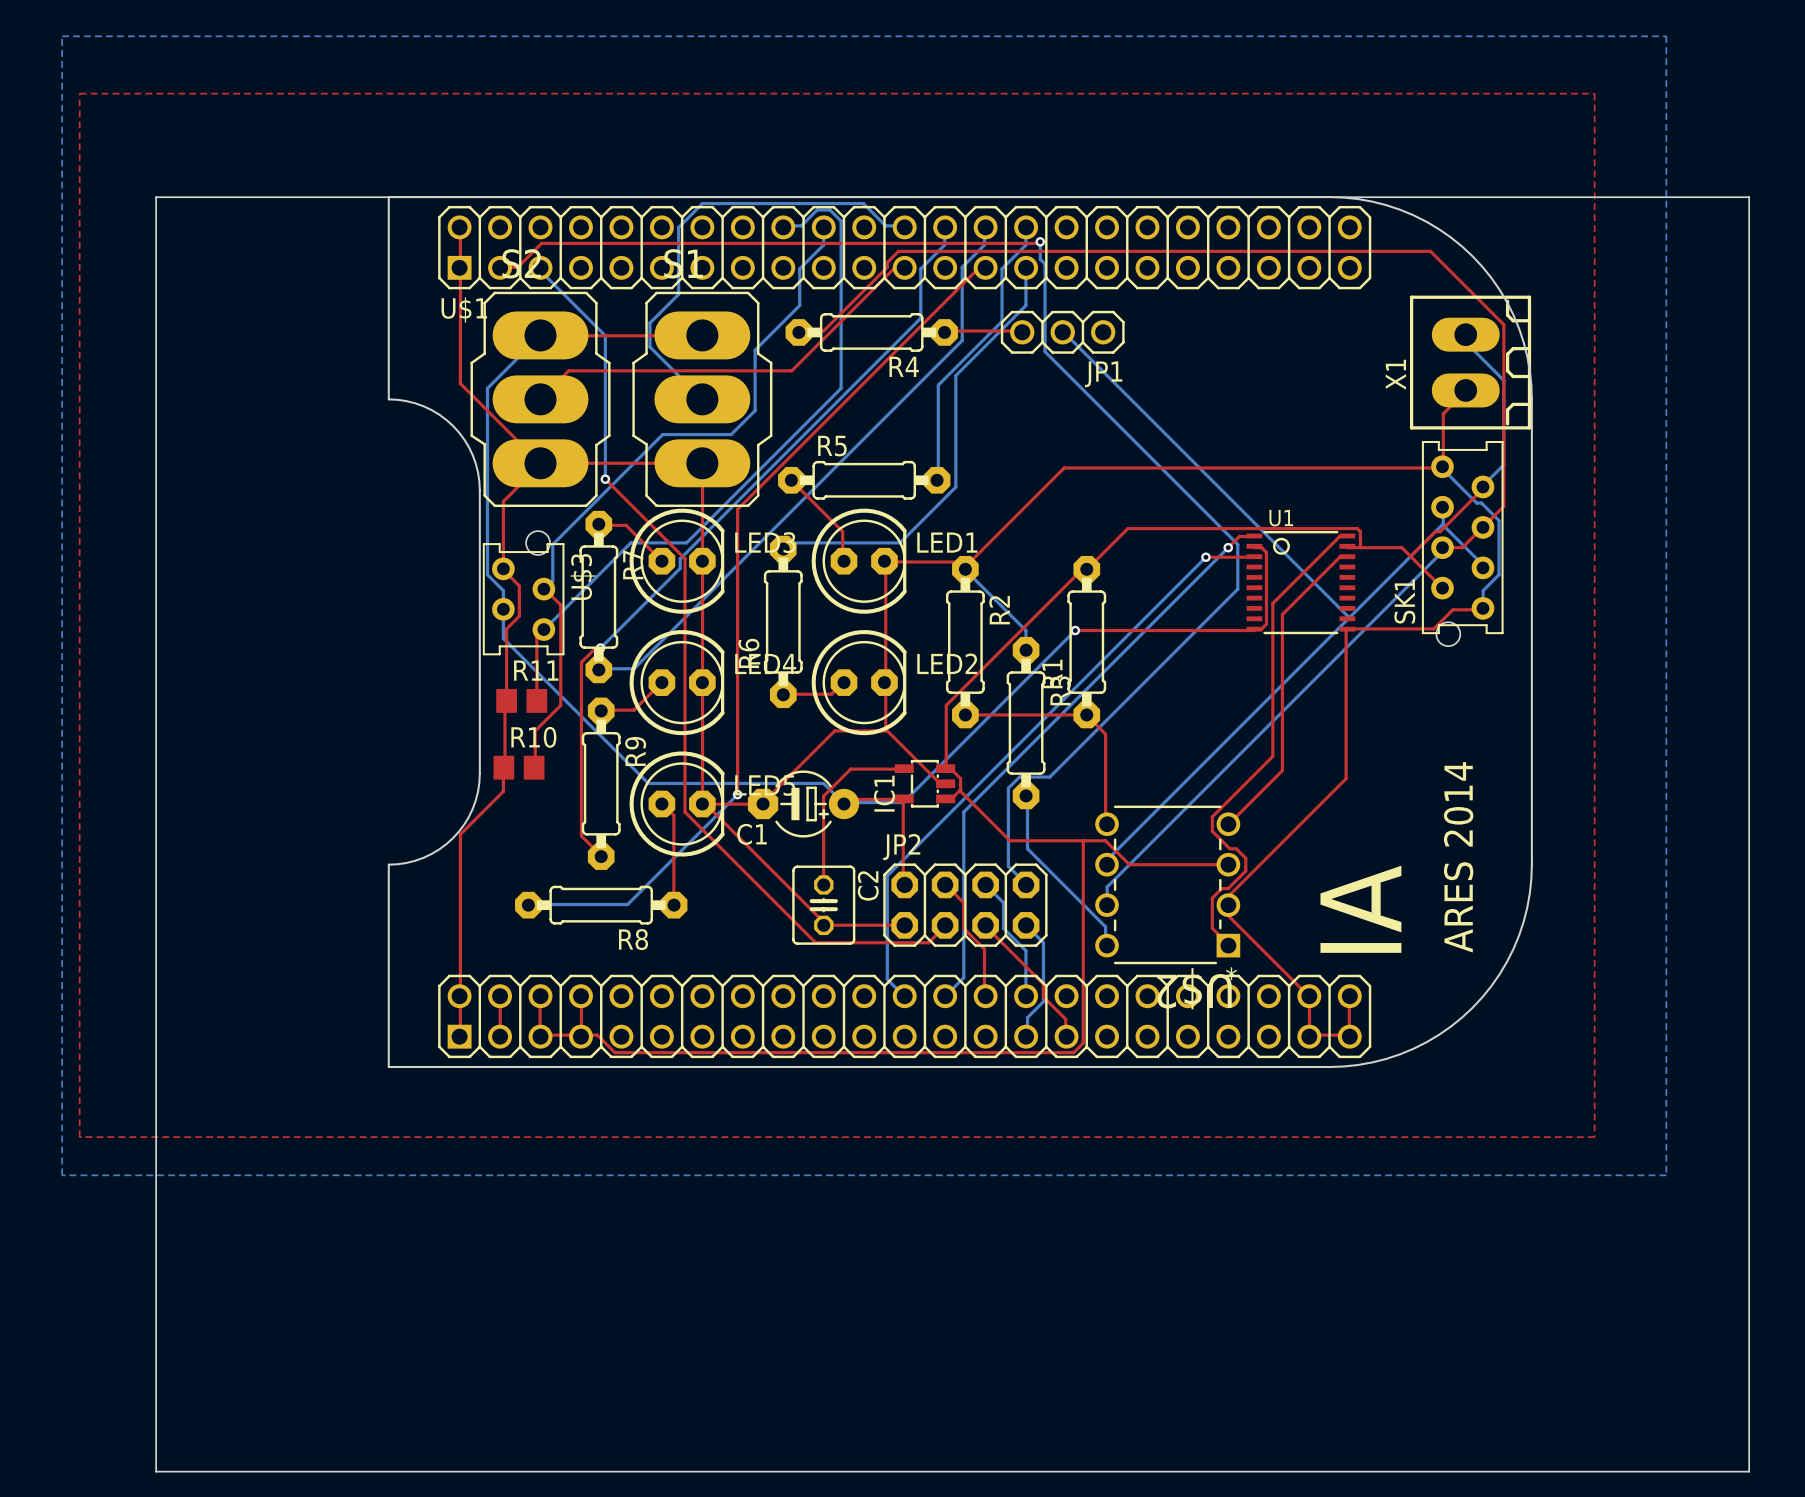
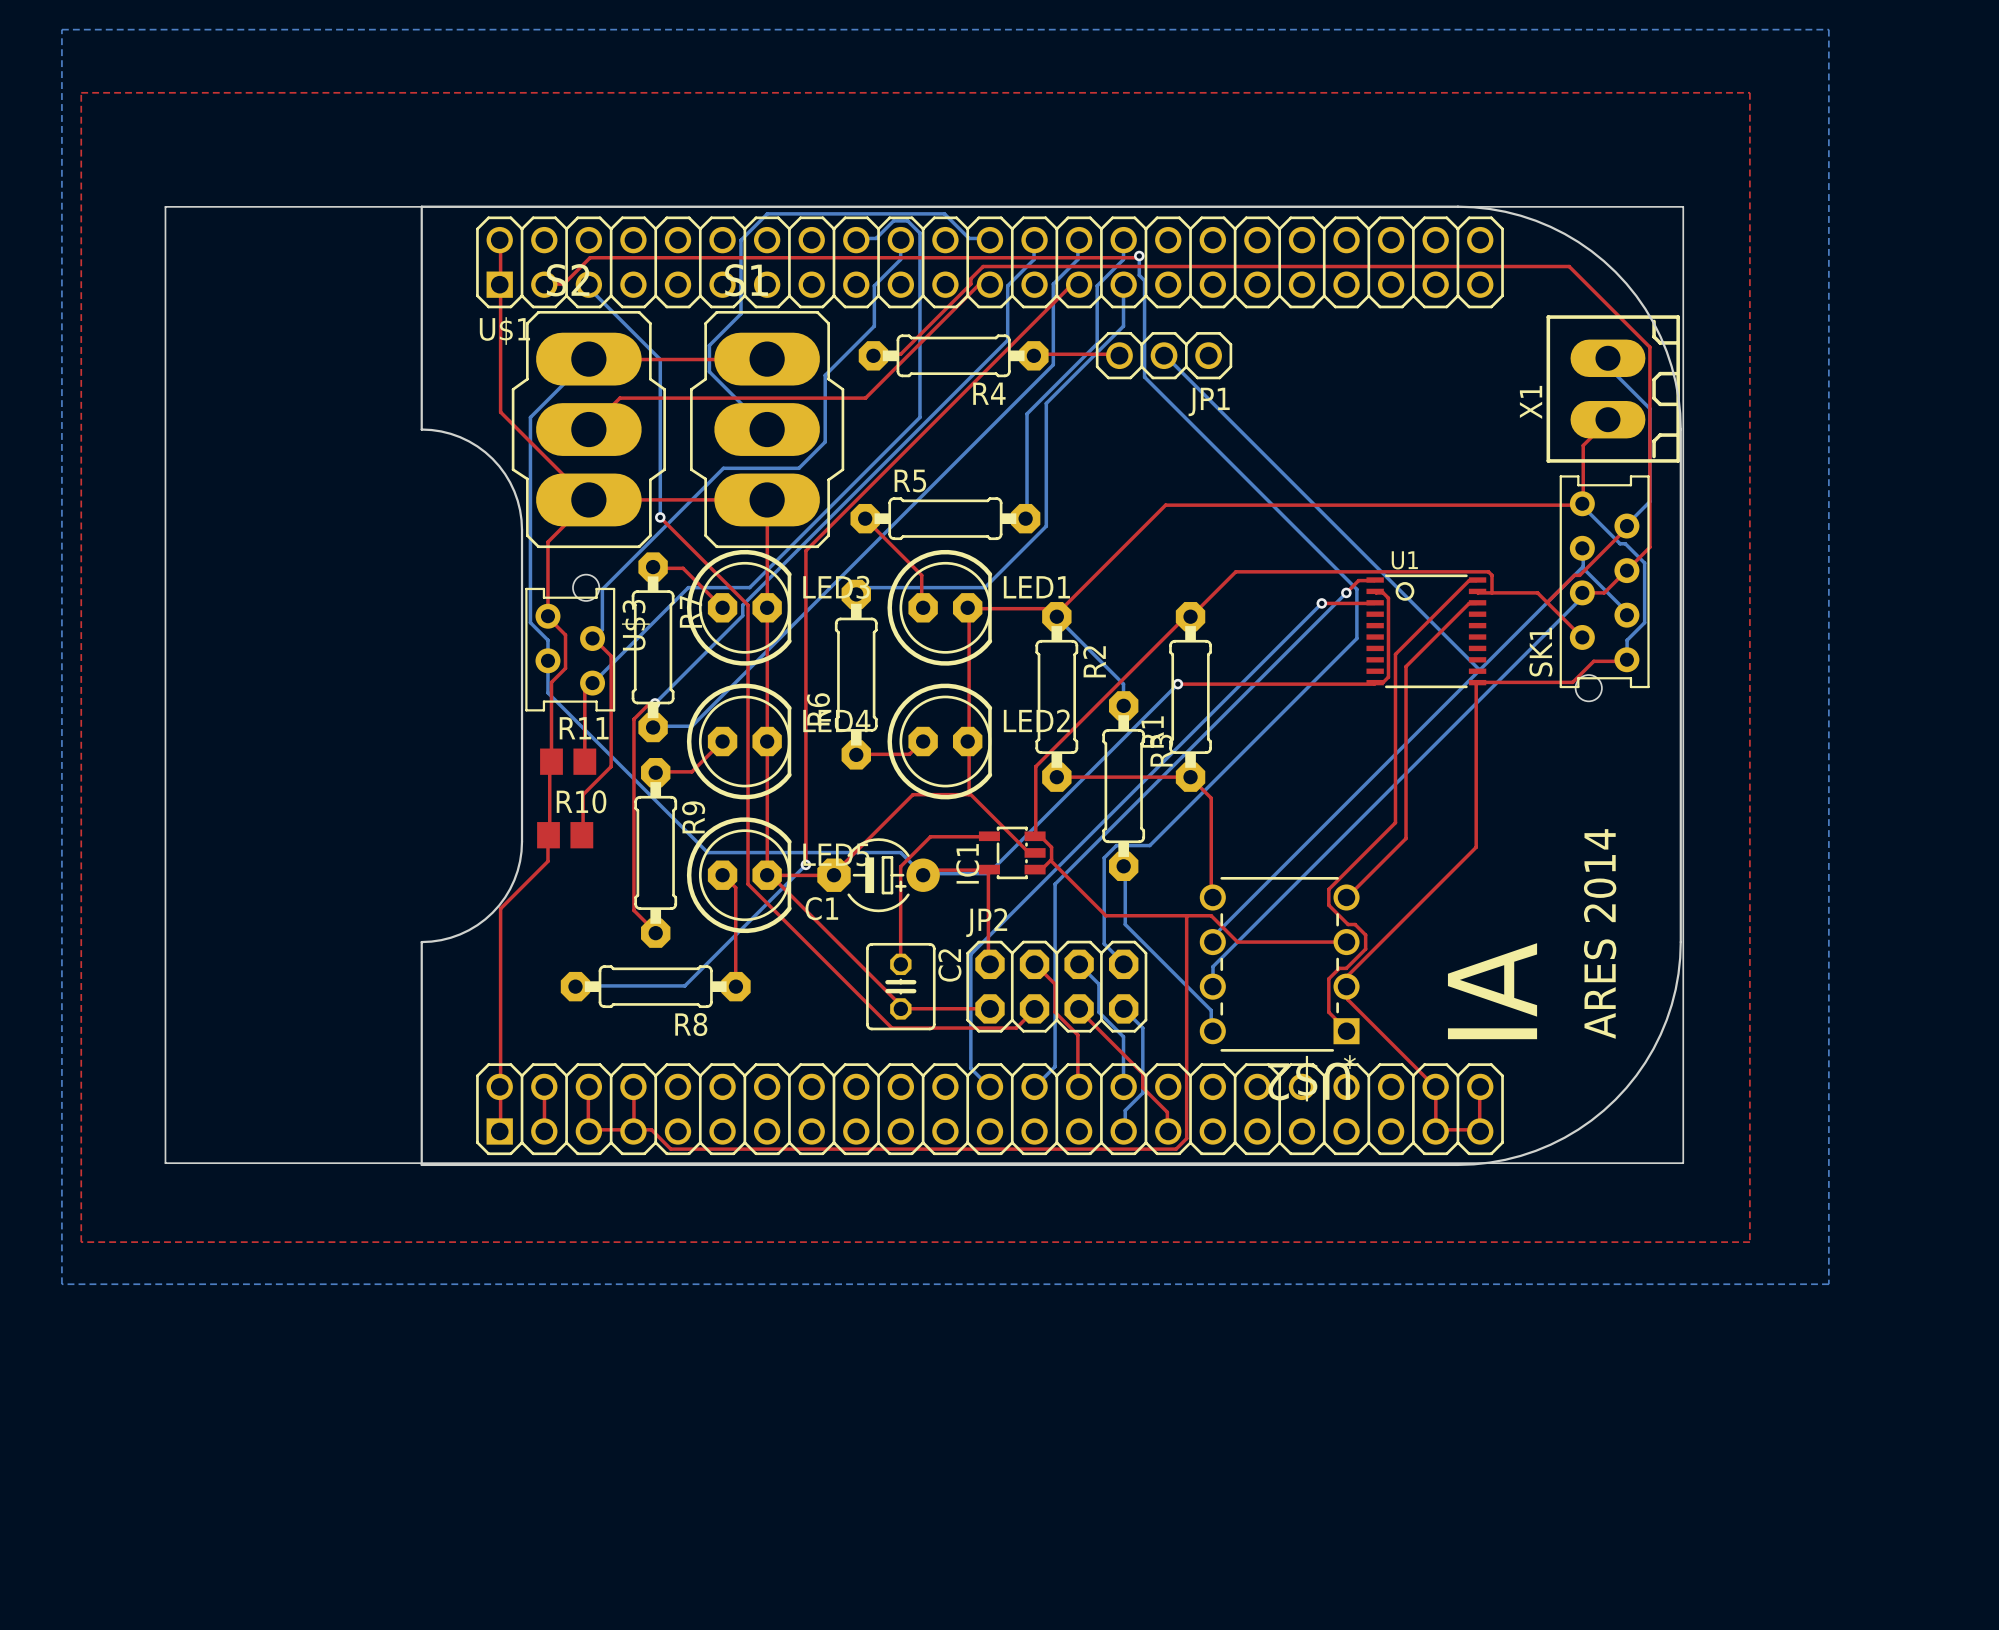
board edge: (1534, 197) (1749, 197) (1749, 1471) (156, 1471) (156, 1065) -> (1683, 206) (1683, 1163) (165, 1163)

